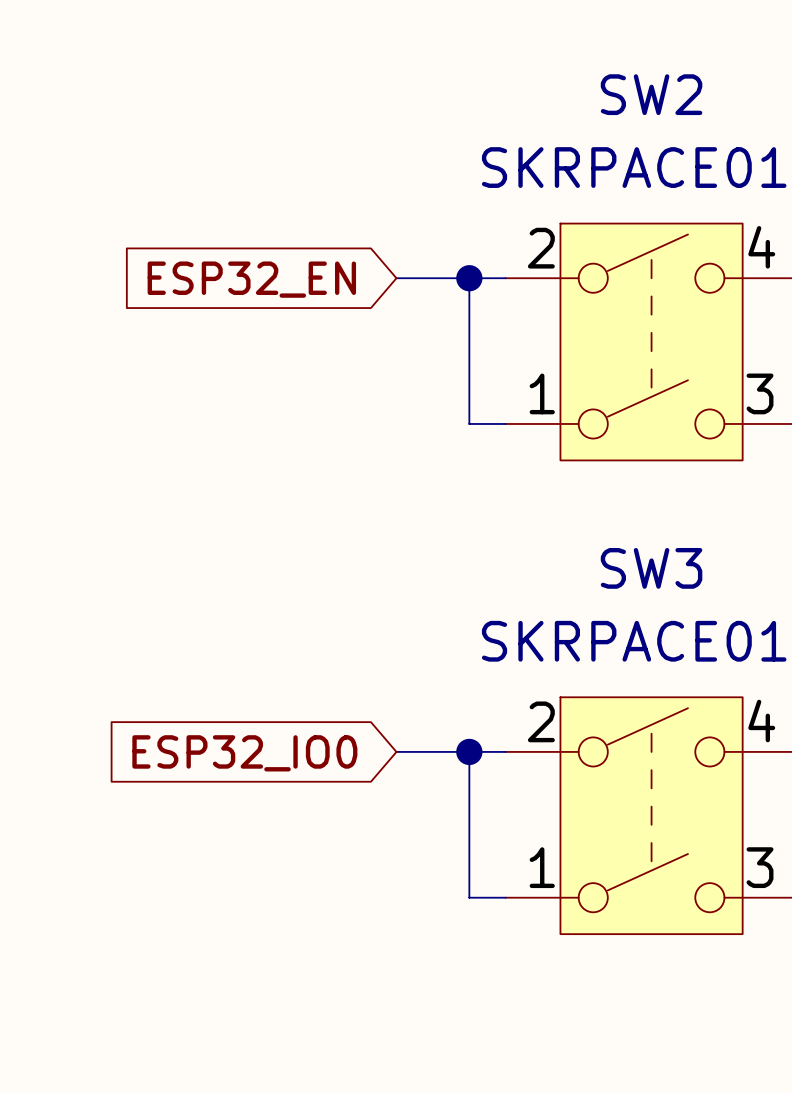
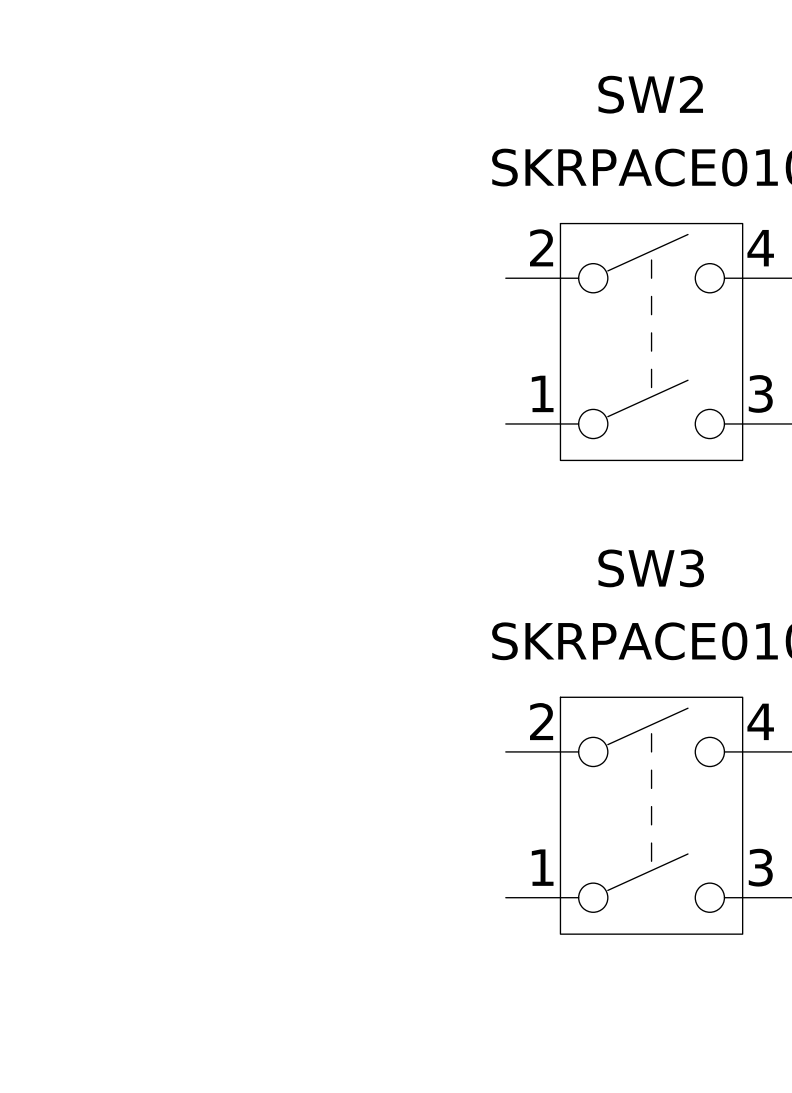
wire: (396, 278) (505, 278) -> none
wire: (469, 278) (469, 423) (505, 423) -> none
junction: (469, 278) -> none
global label: ESP32_EN (251, 279) -> none
wire: (396, 751) (505, 751) -> none
wire: (469, 751) (469, 897) (505, 897) -> none
junction: (469, 751) -> none
global label: ESP32_IO0 (244, 753) -> none

